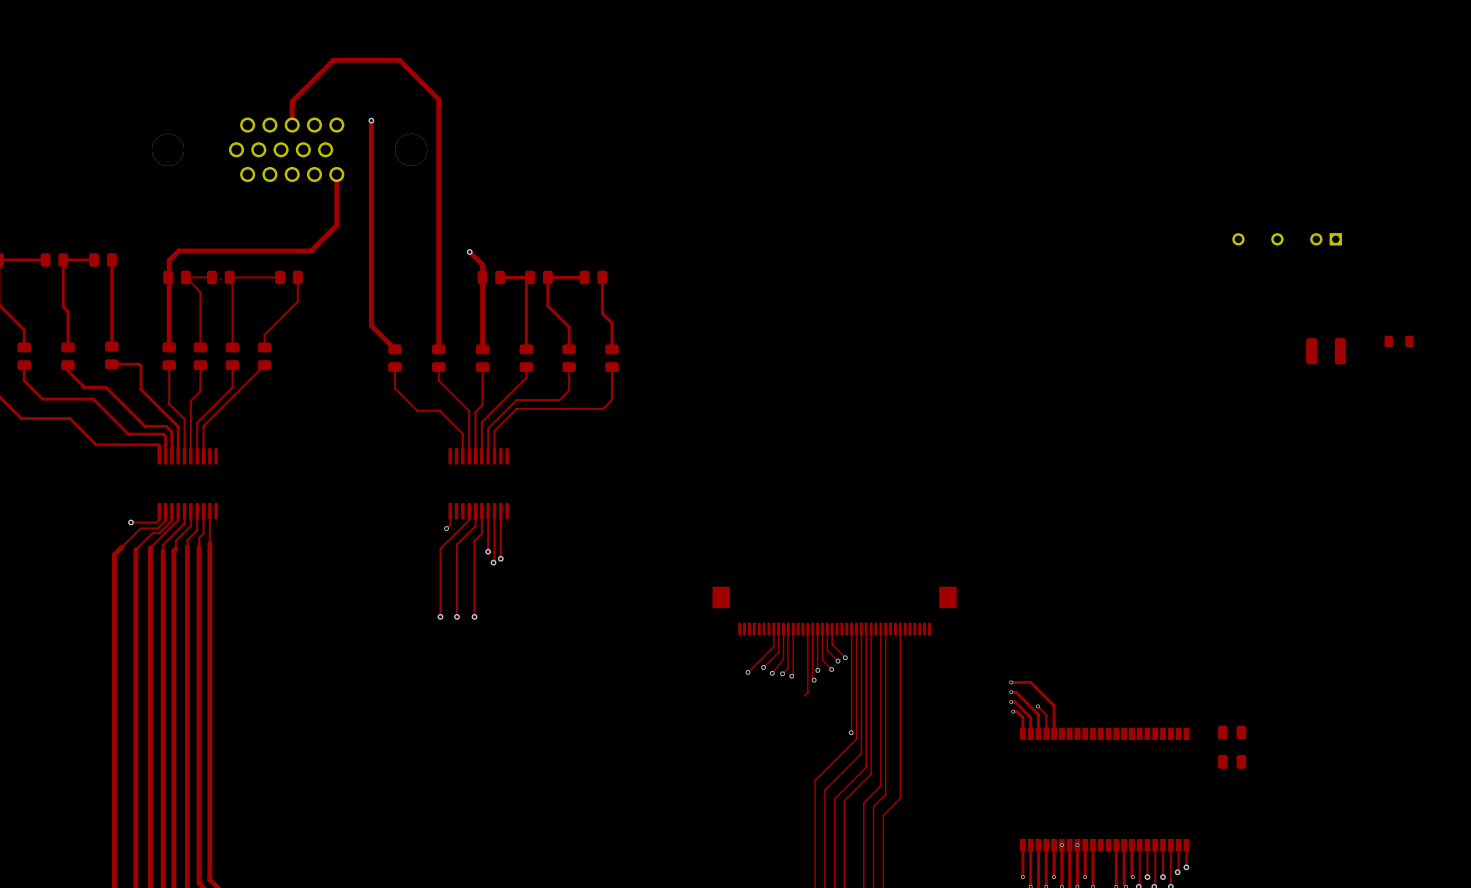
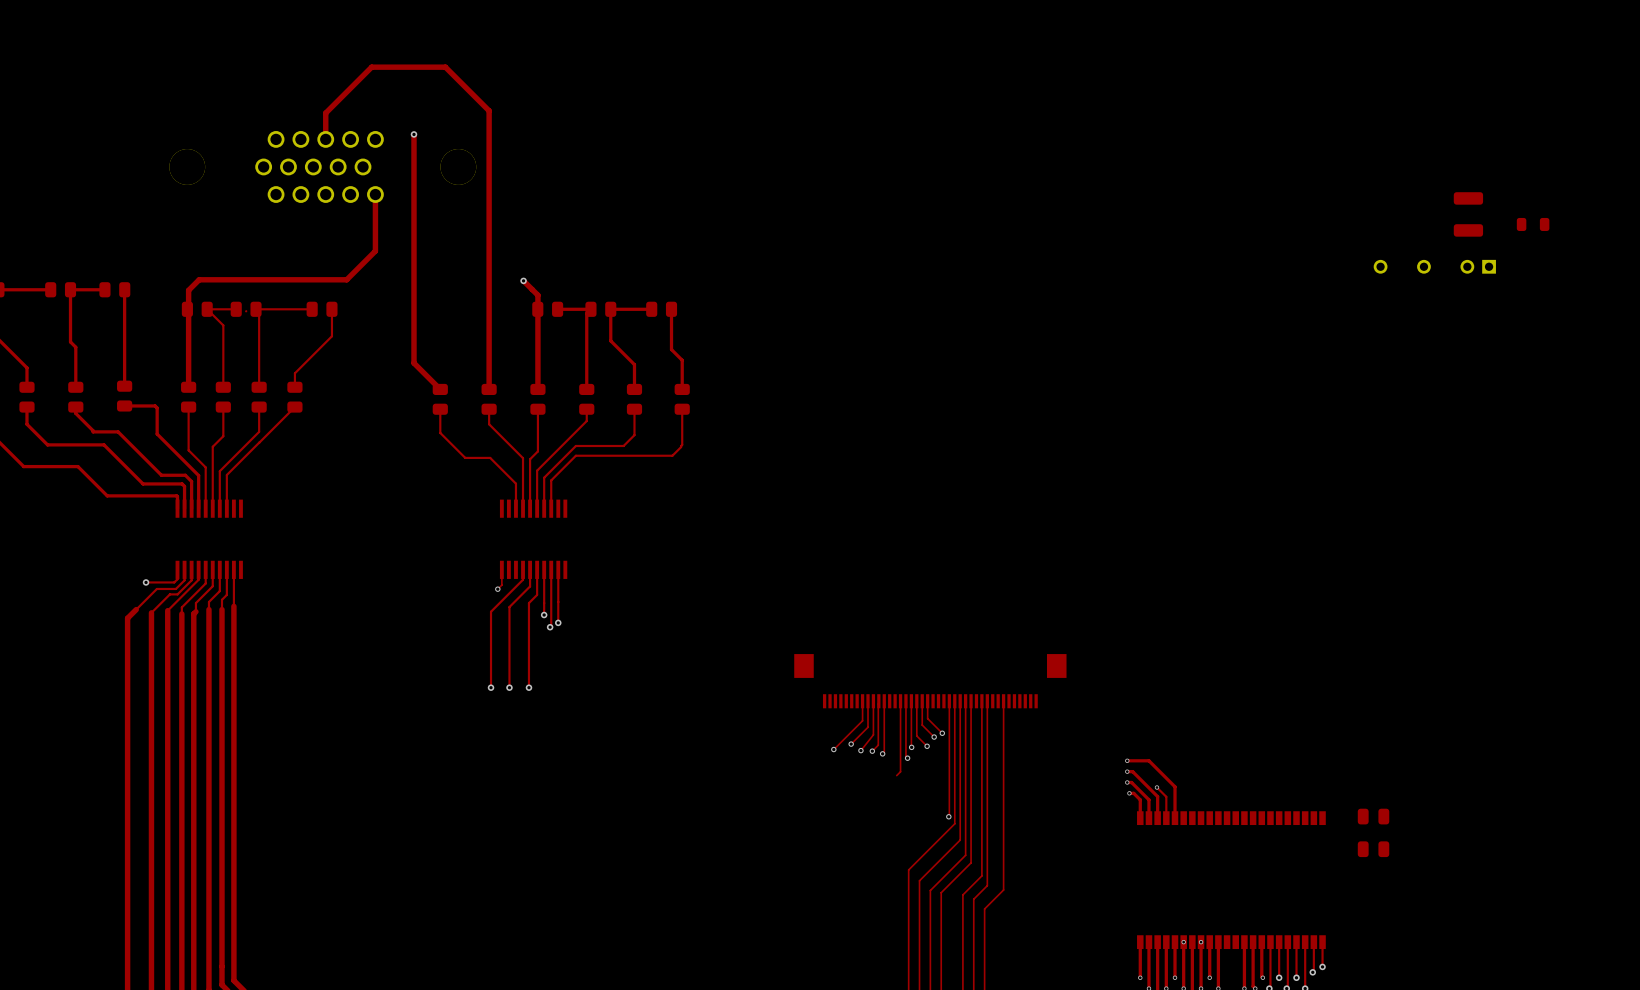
part position: (1399, 341) -> (1533, 224)
part rotation: 0° (1326, 351) -> 90° clockwise (1468, 214)
part position: (1326, 351) -> (1468, 214)

